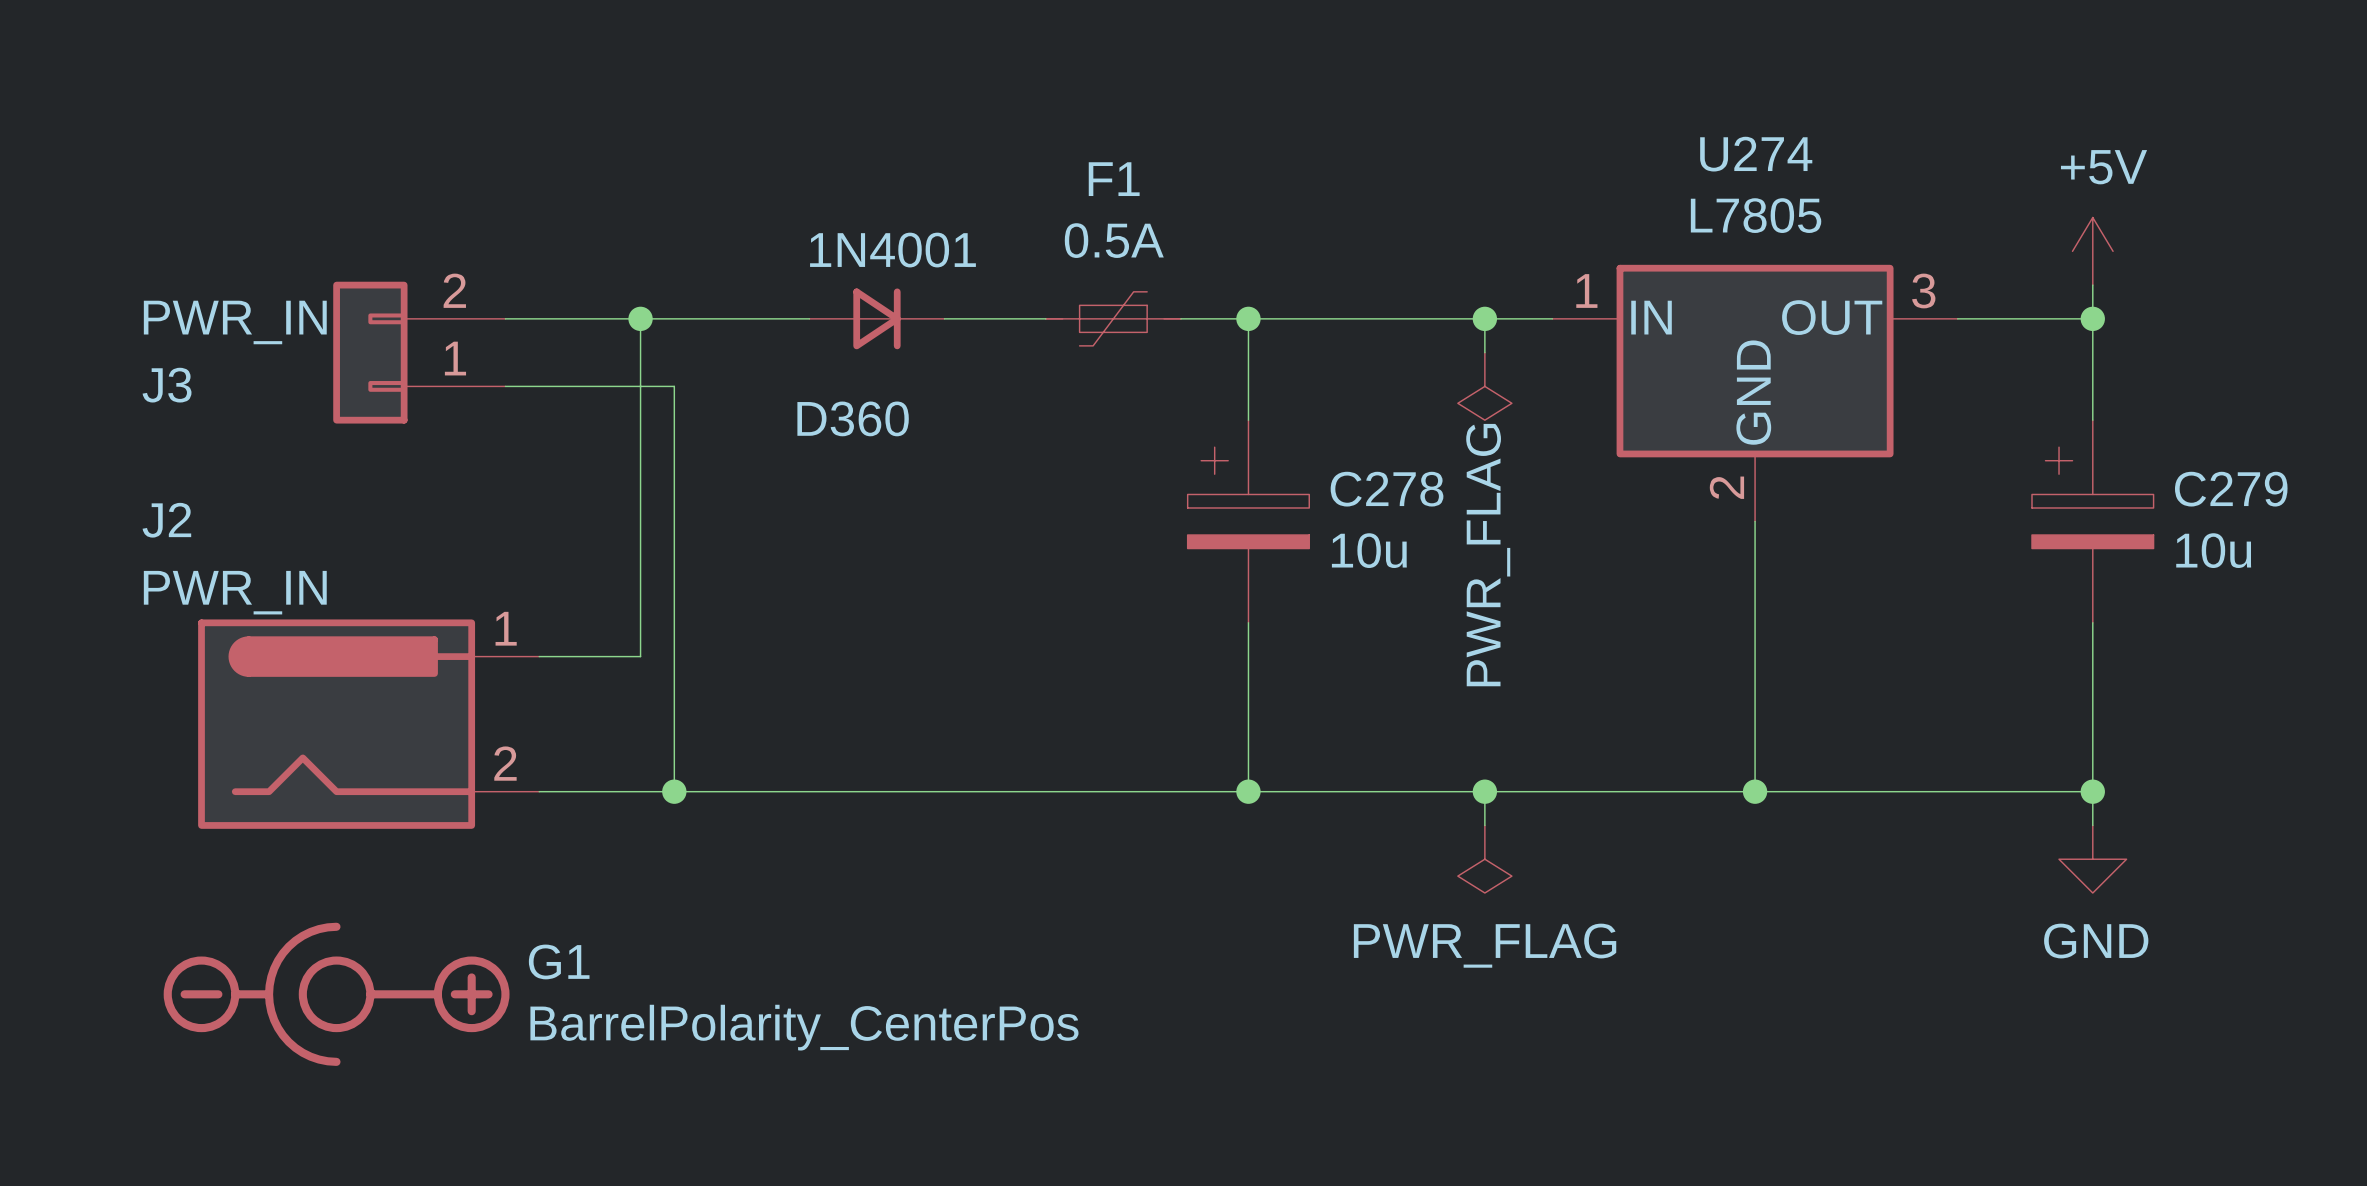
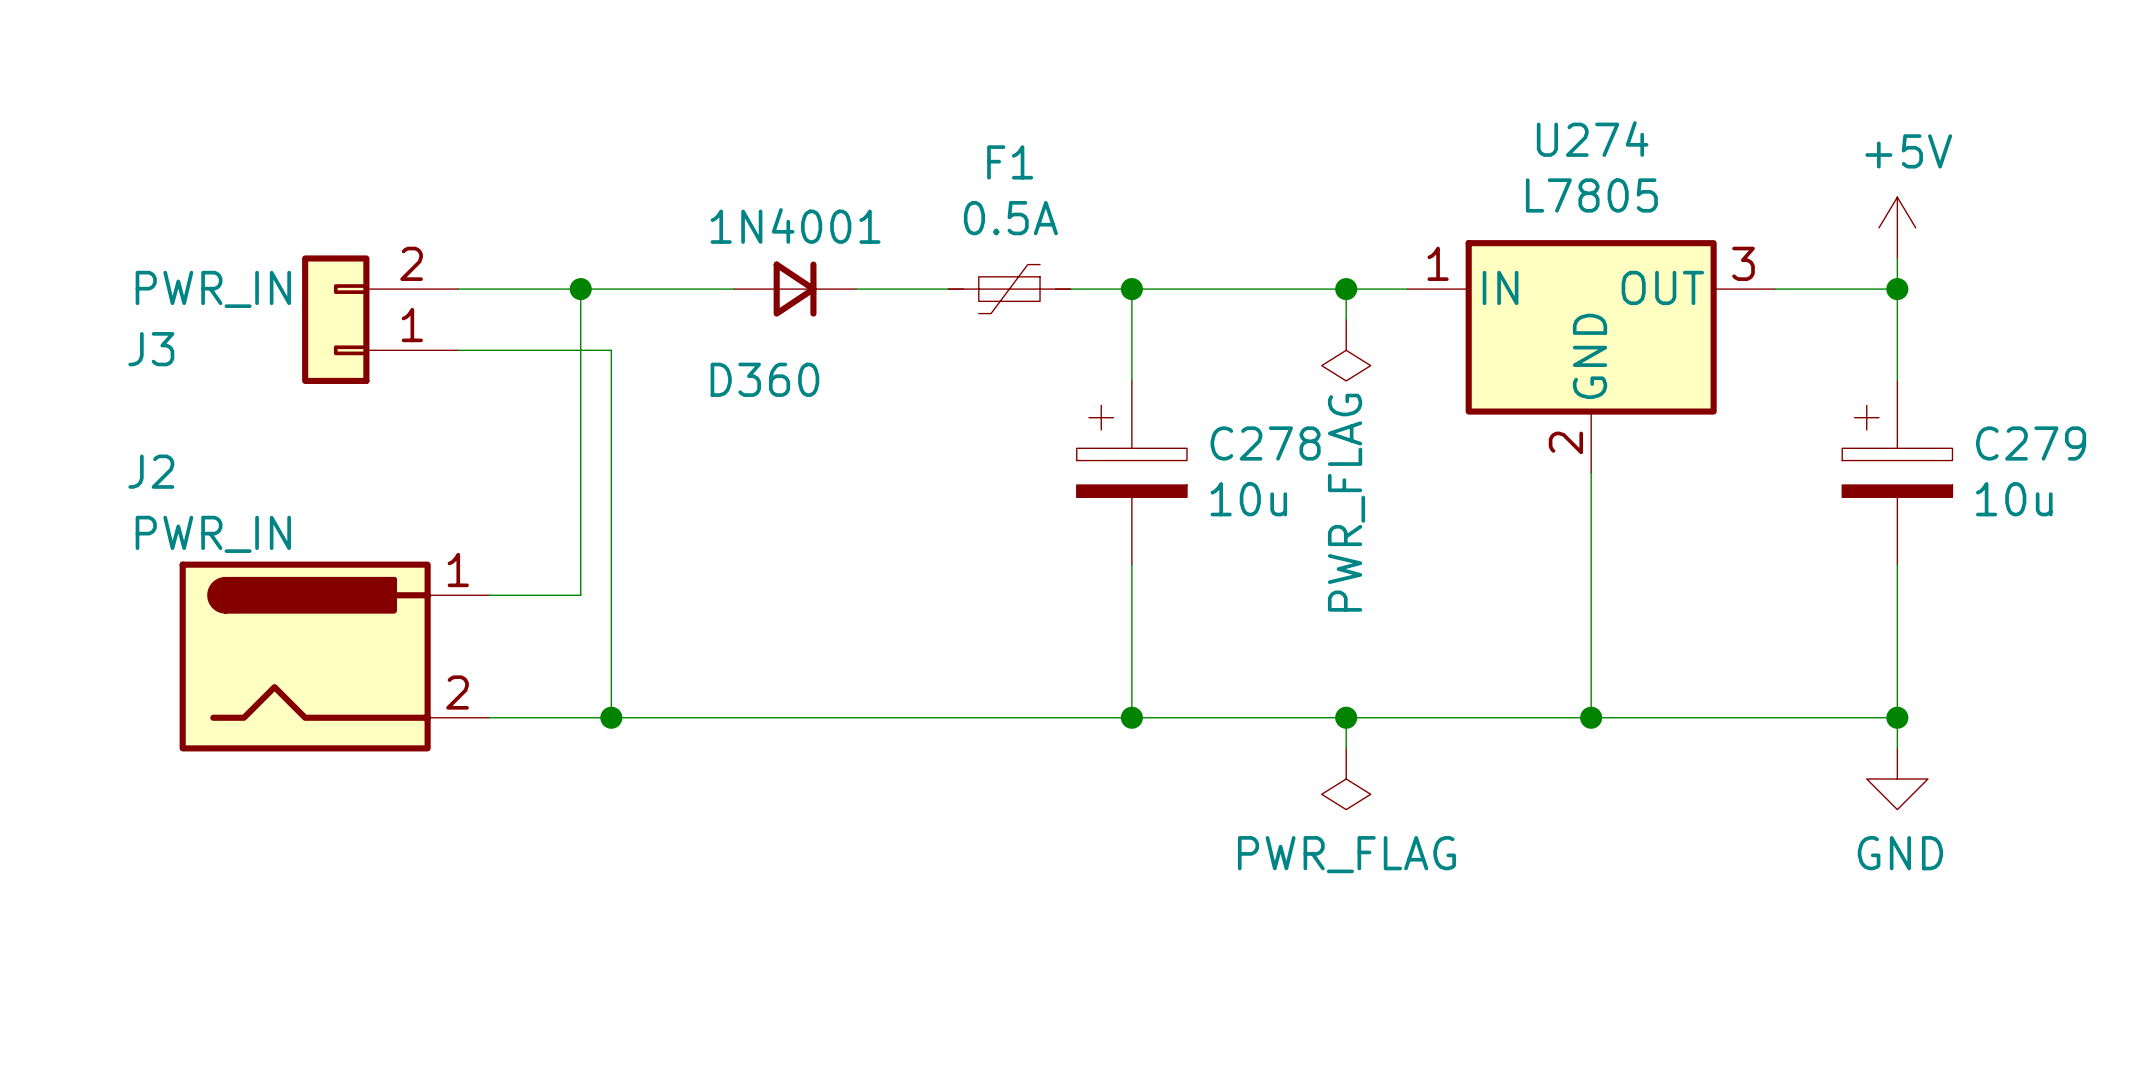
G1: BarrelPolarity_CenterPos (336, 994) -> none

